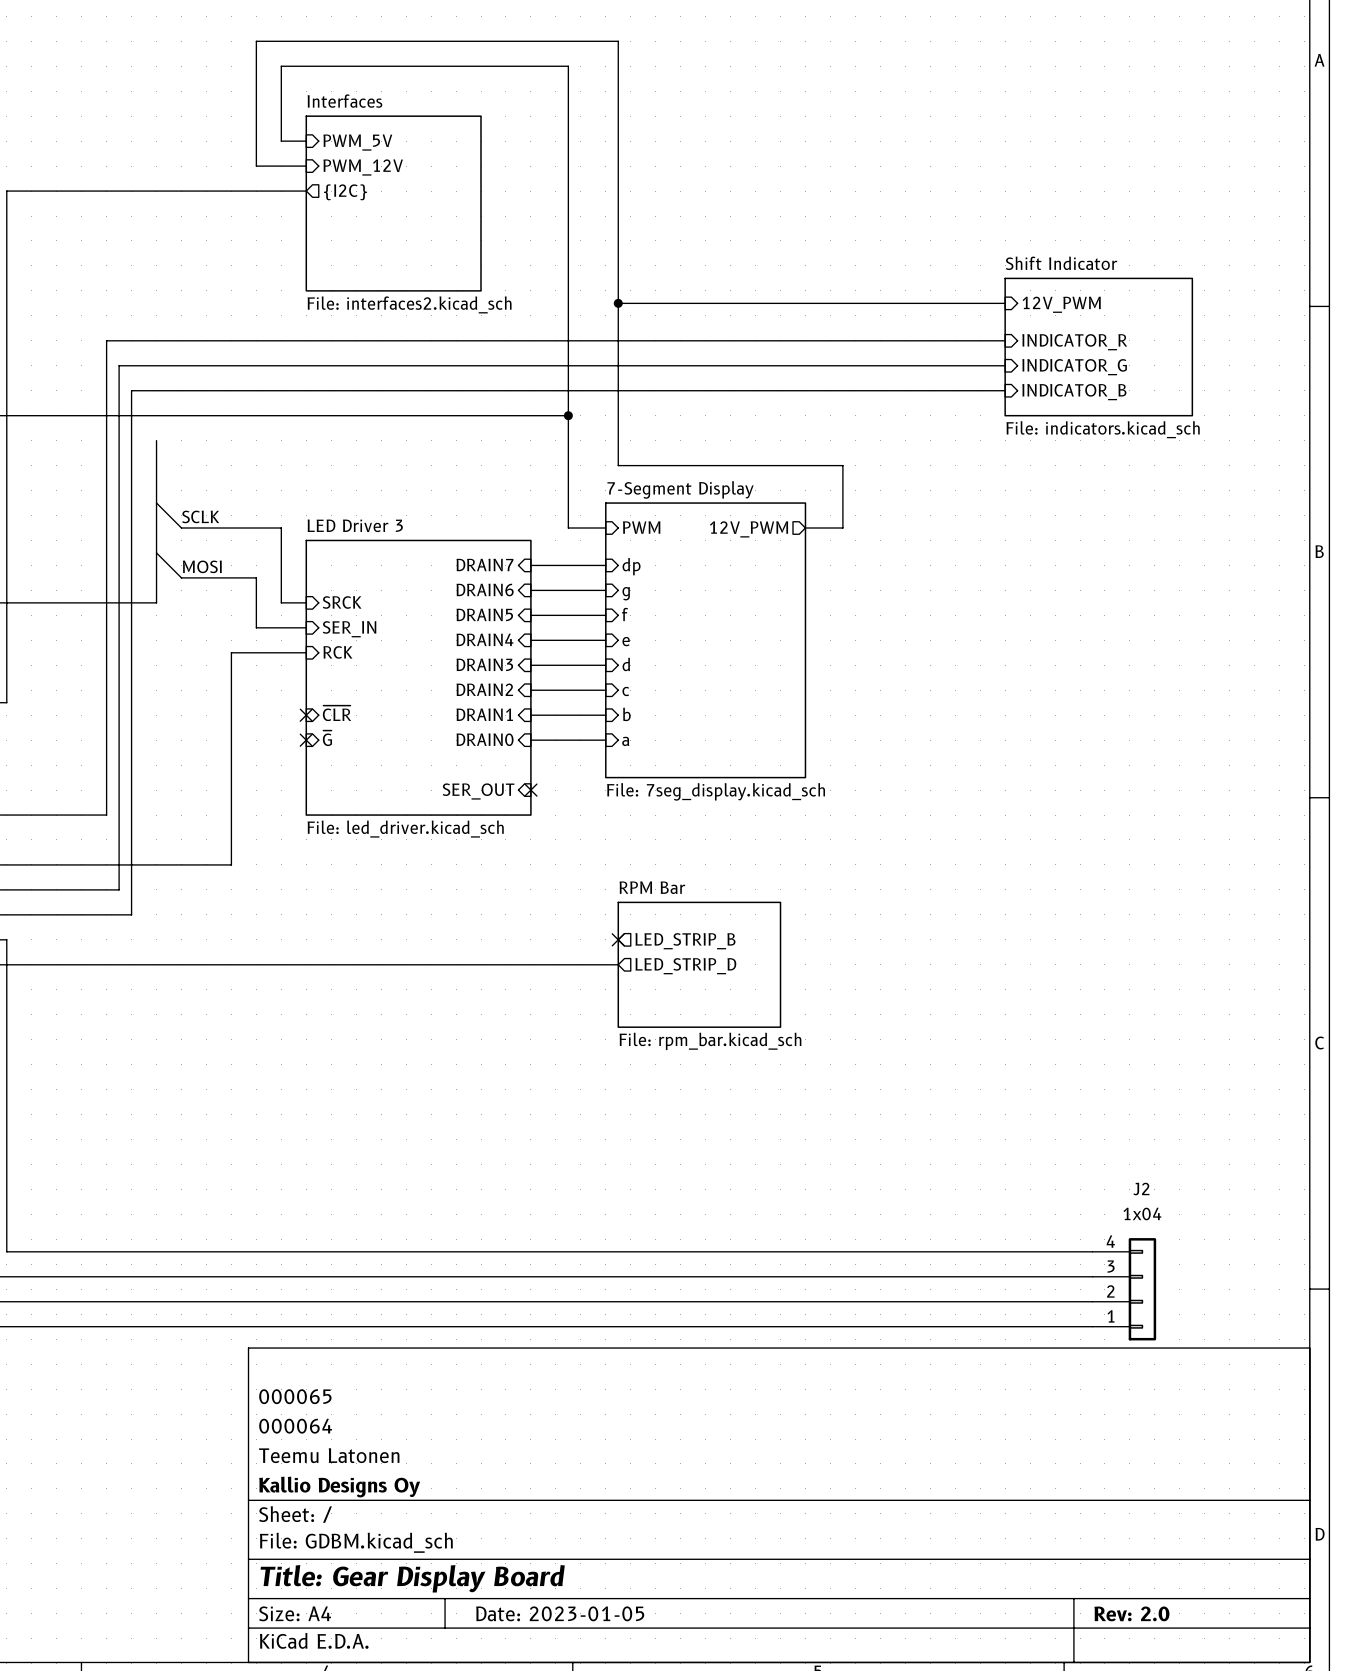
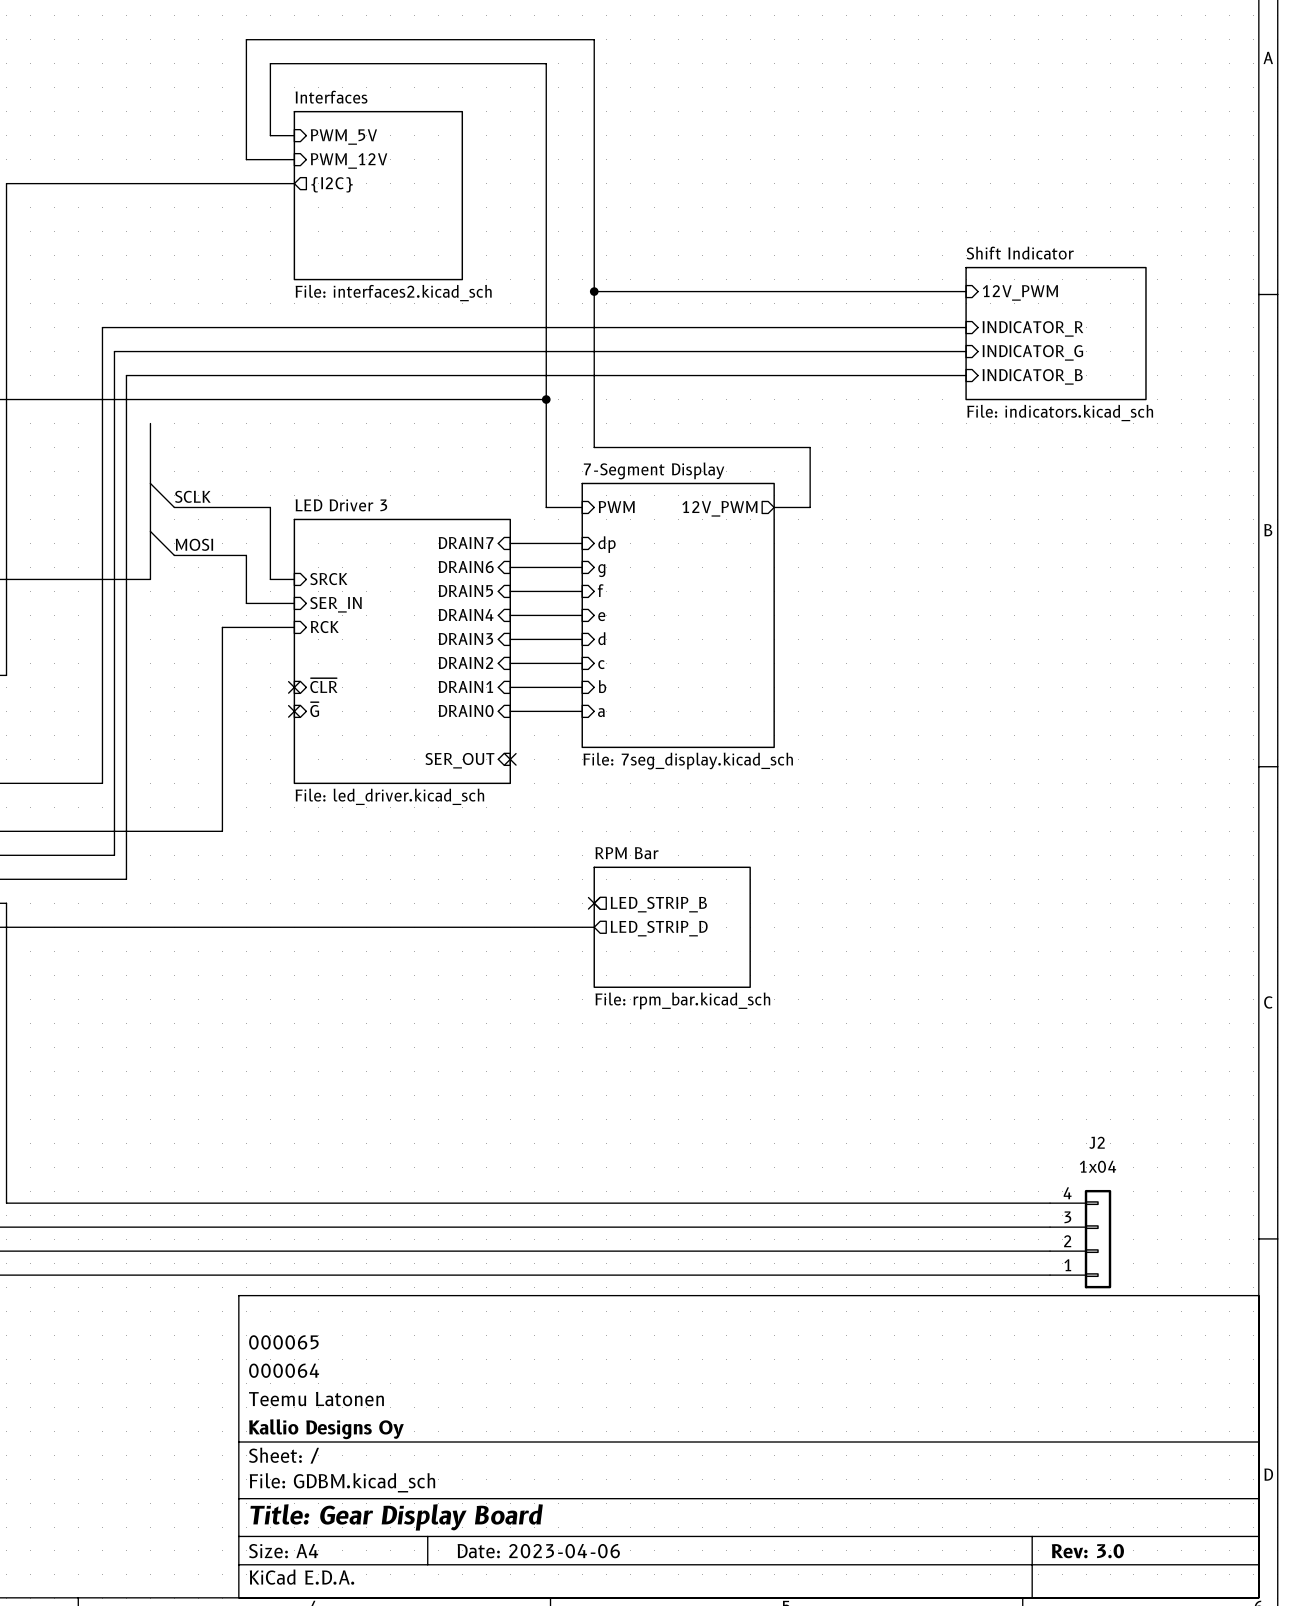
title block: Date: 2023-01-05 (560, 1613) -> Date: 2023-04-06 (538, 1551)
title block: Rev: 2.0 (1131, 1613) -> Rev: 3.0 (1087, 1551)

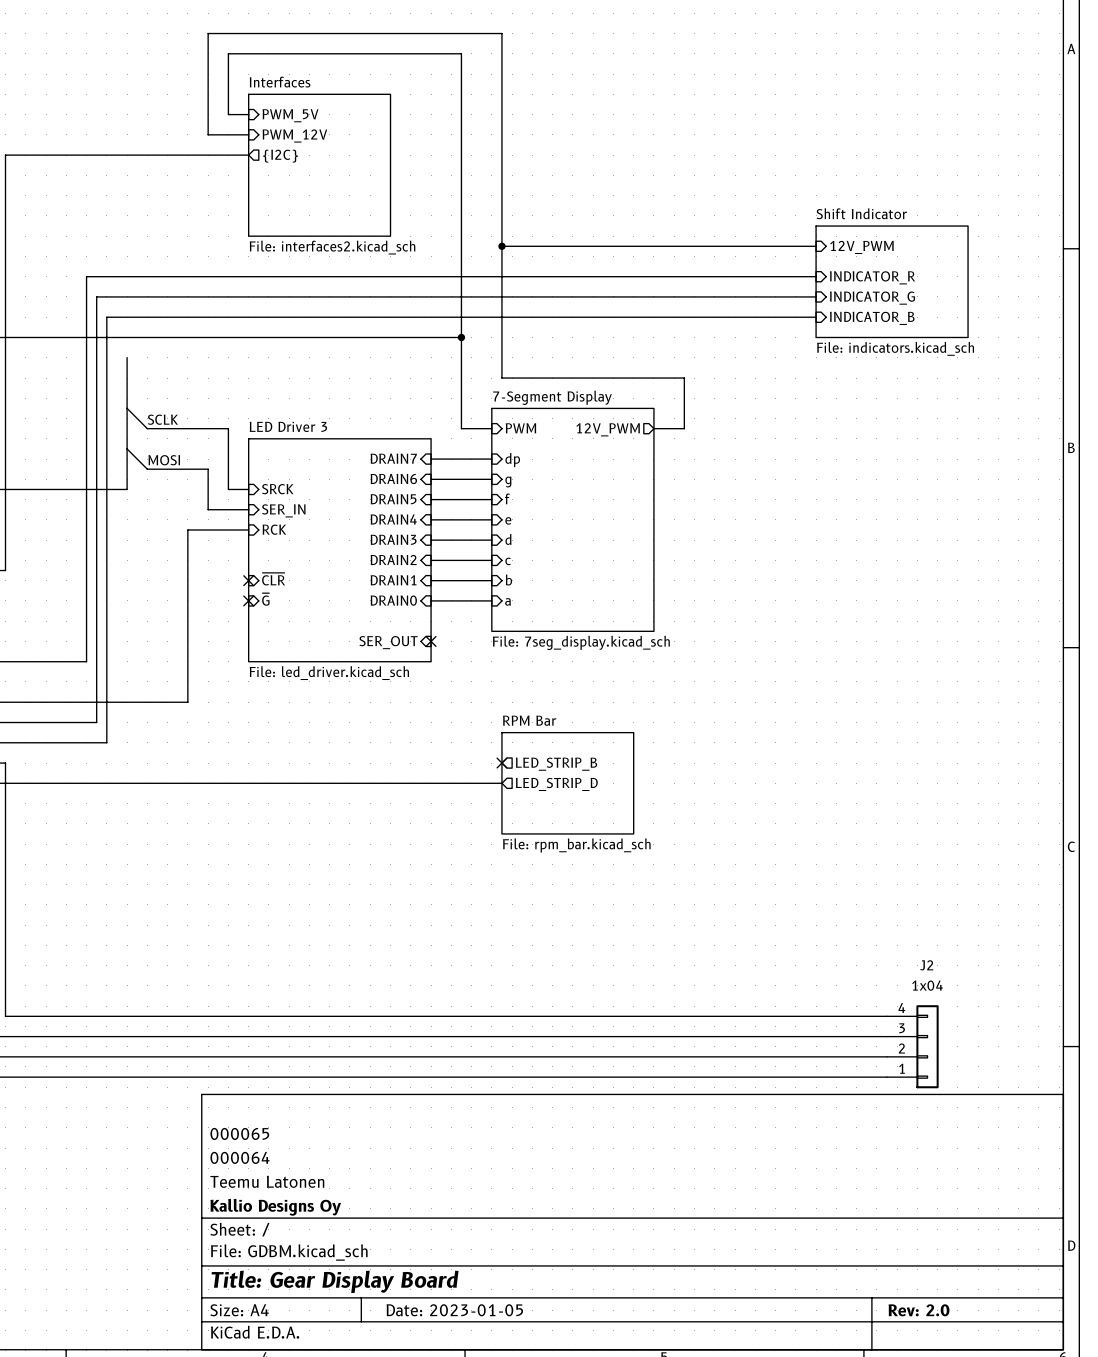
title block: Date: 2023-04-06 (538, 1551) -> Date: 2023-01-05 (454, 1310)
title block: Rev: 3.0 (1087, 1551) -> Rev: 2.0 (918, 1310)

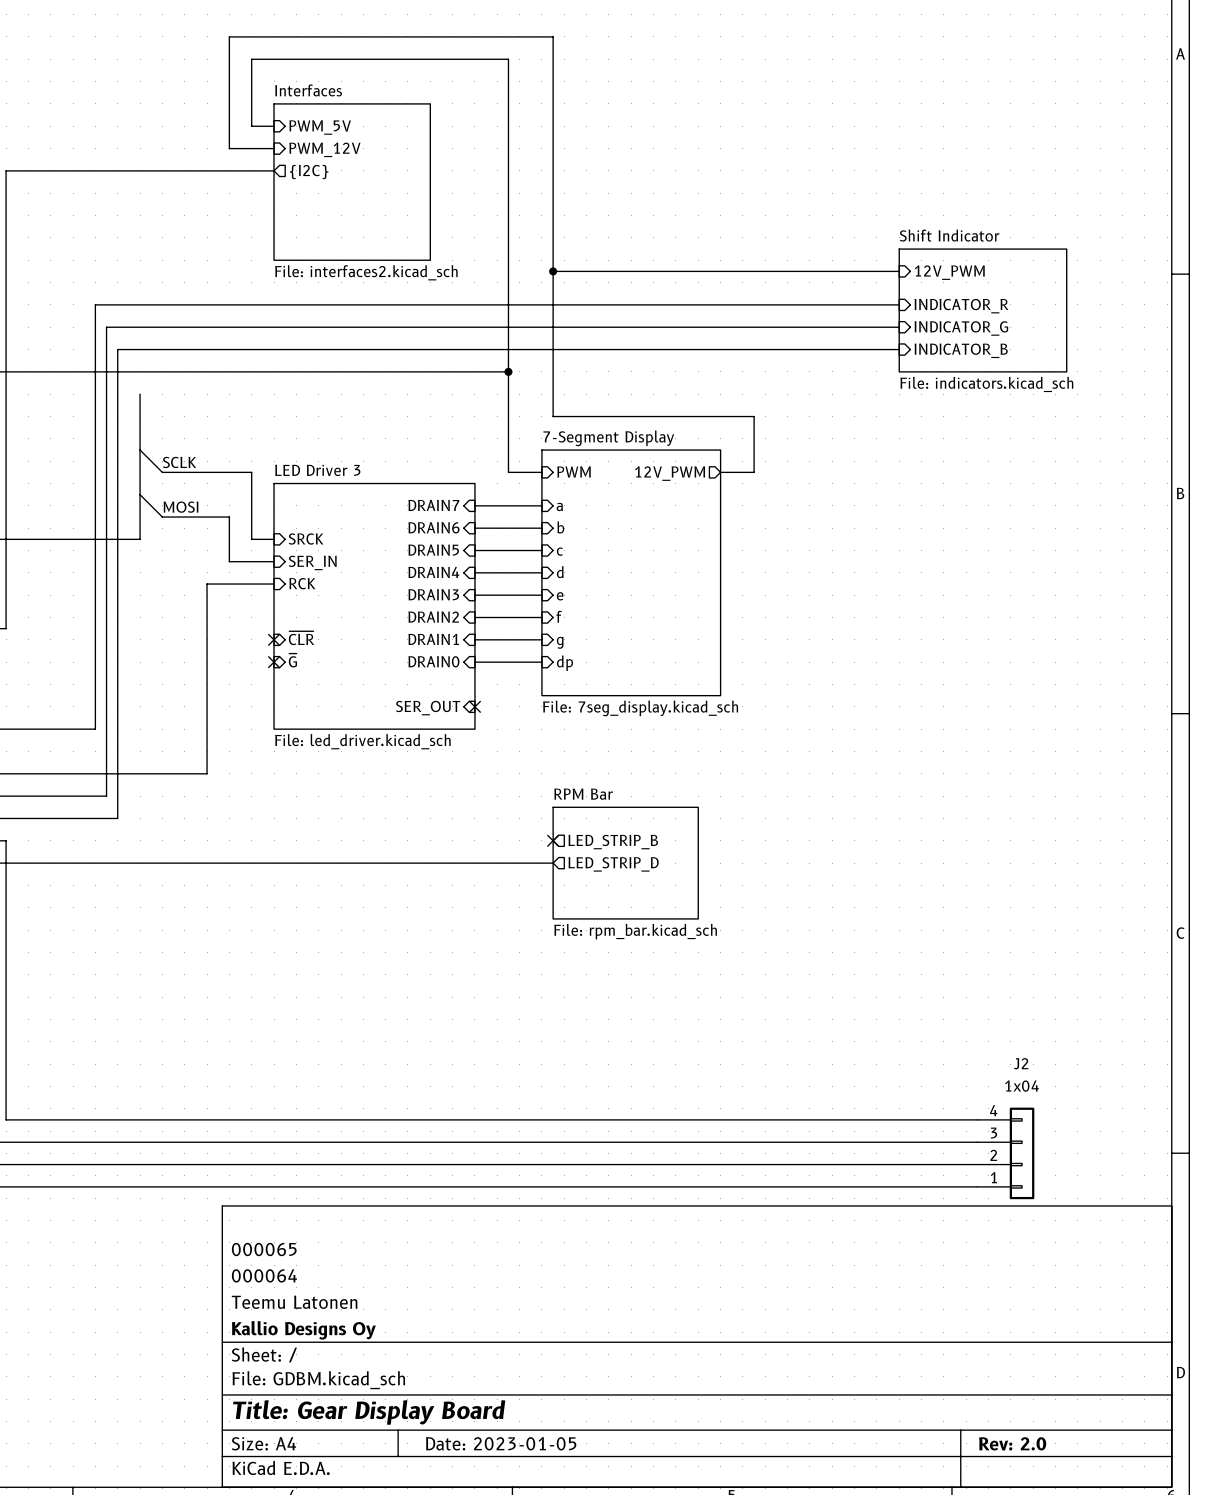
sheet pin: dp (512, 460) -> a (559, 506)
sheet pin: g (508, 482) -> b (560, 527)
sheet pin: f (507, 498) -> c (559, 551)
sheet pin: e (508, 520) -> d (560, 572)
sheet pin: d (508, 539) -> e (560, 596)
sheet pin: c (508, 561) -> f (559, 616)
sheet pin: b (508, 580) -> g (560, 642)
sheet pin: a (508, 601) -> dp (564, 663)

